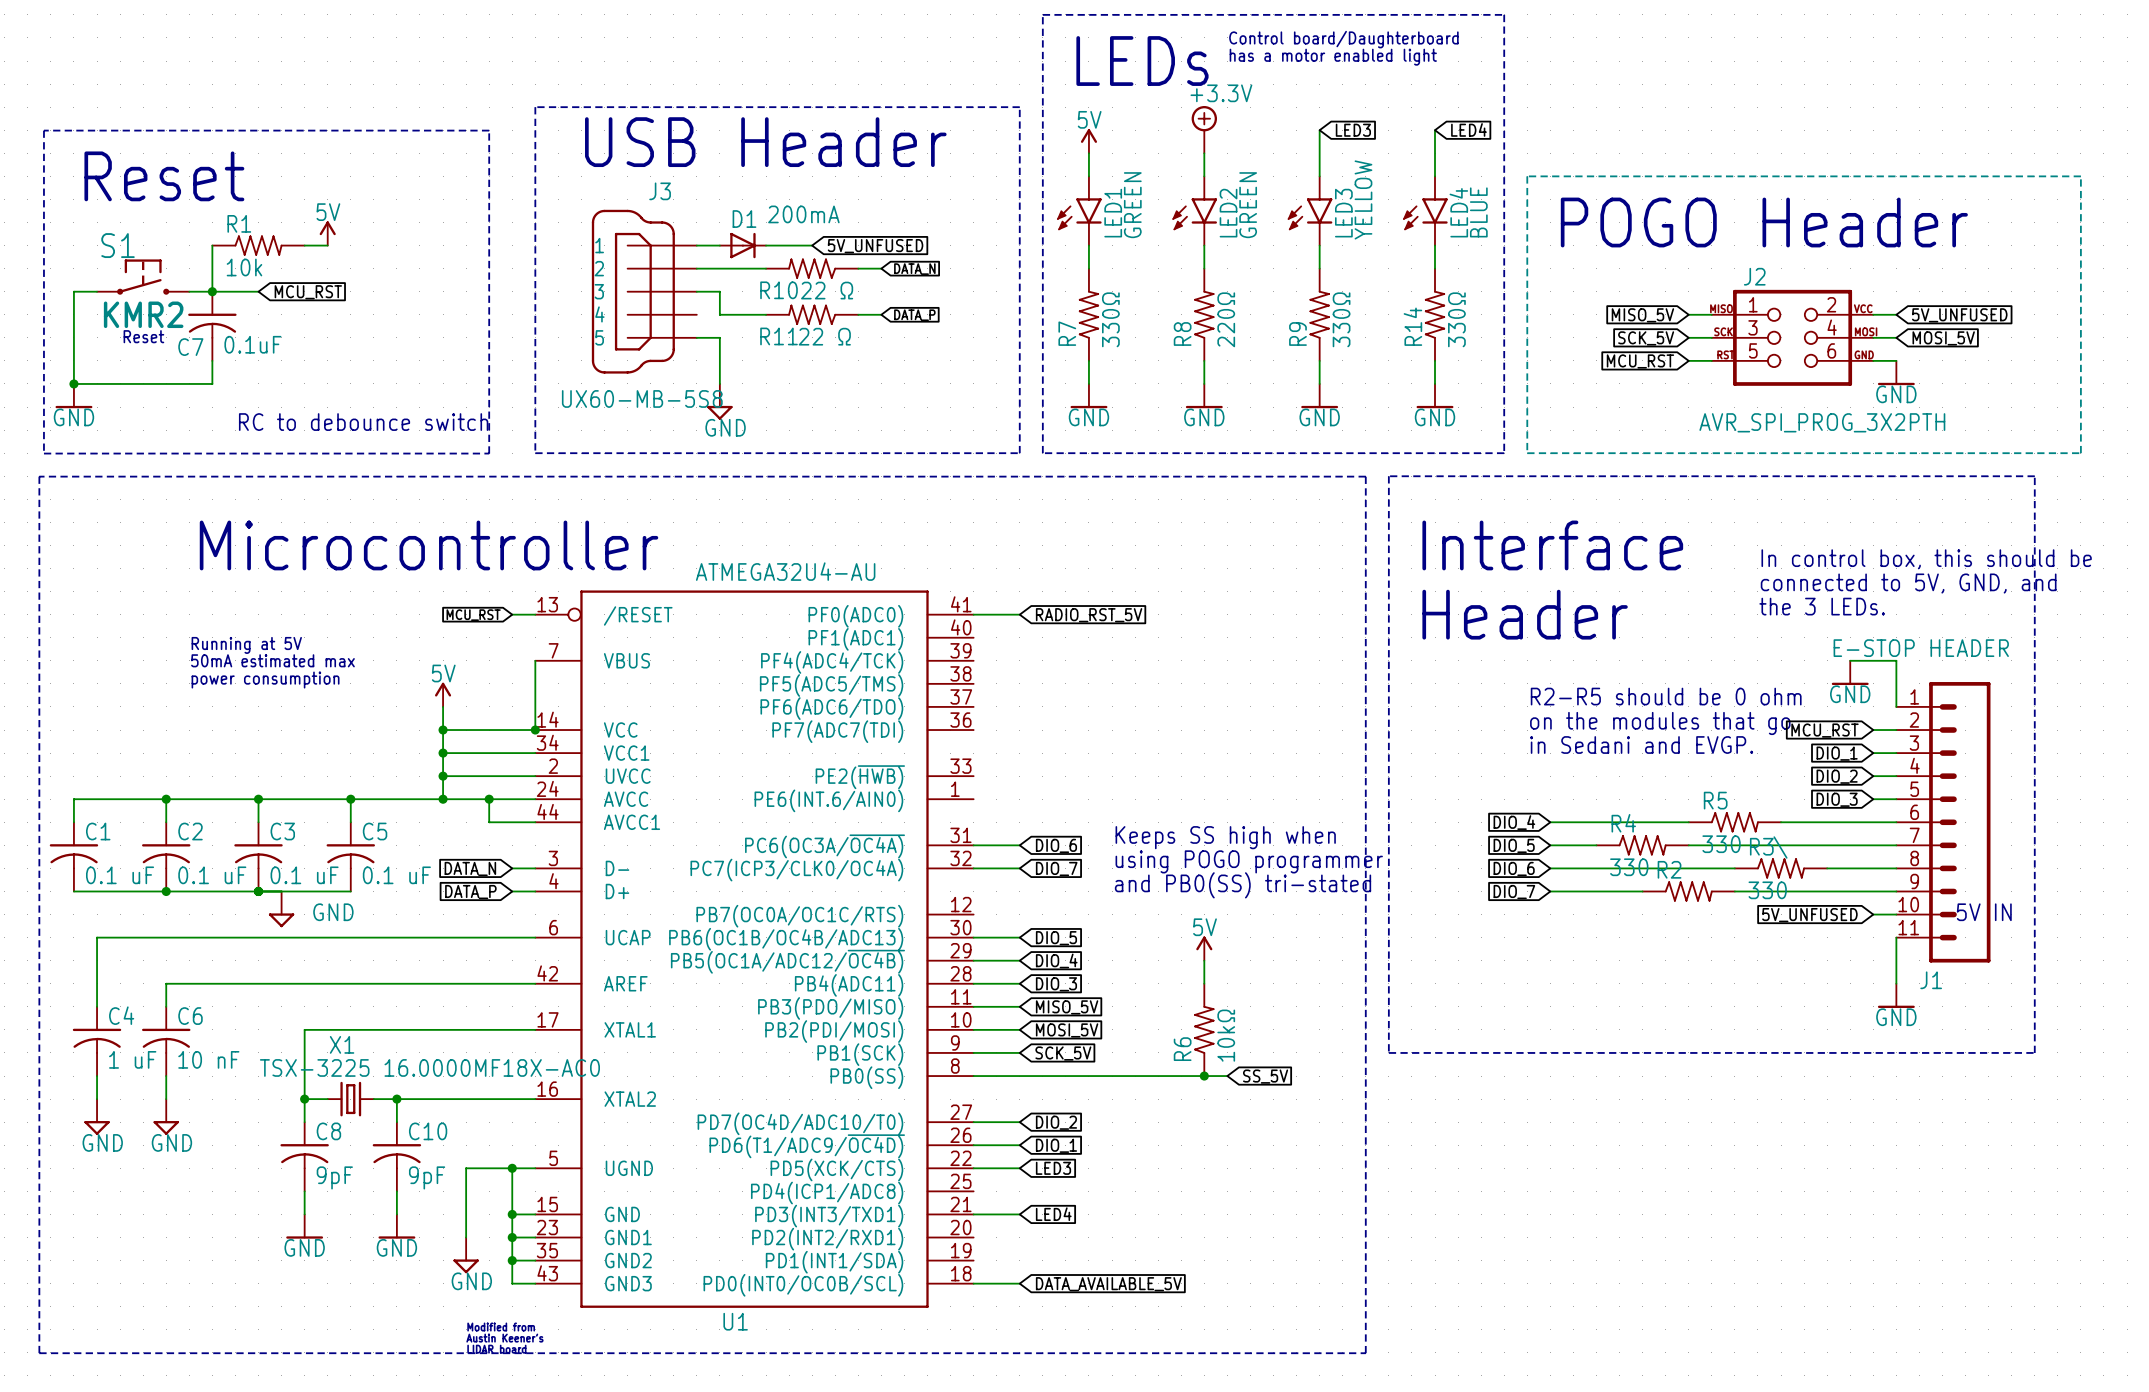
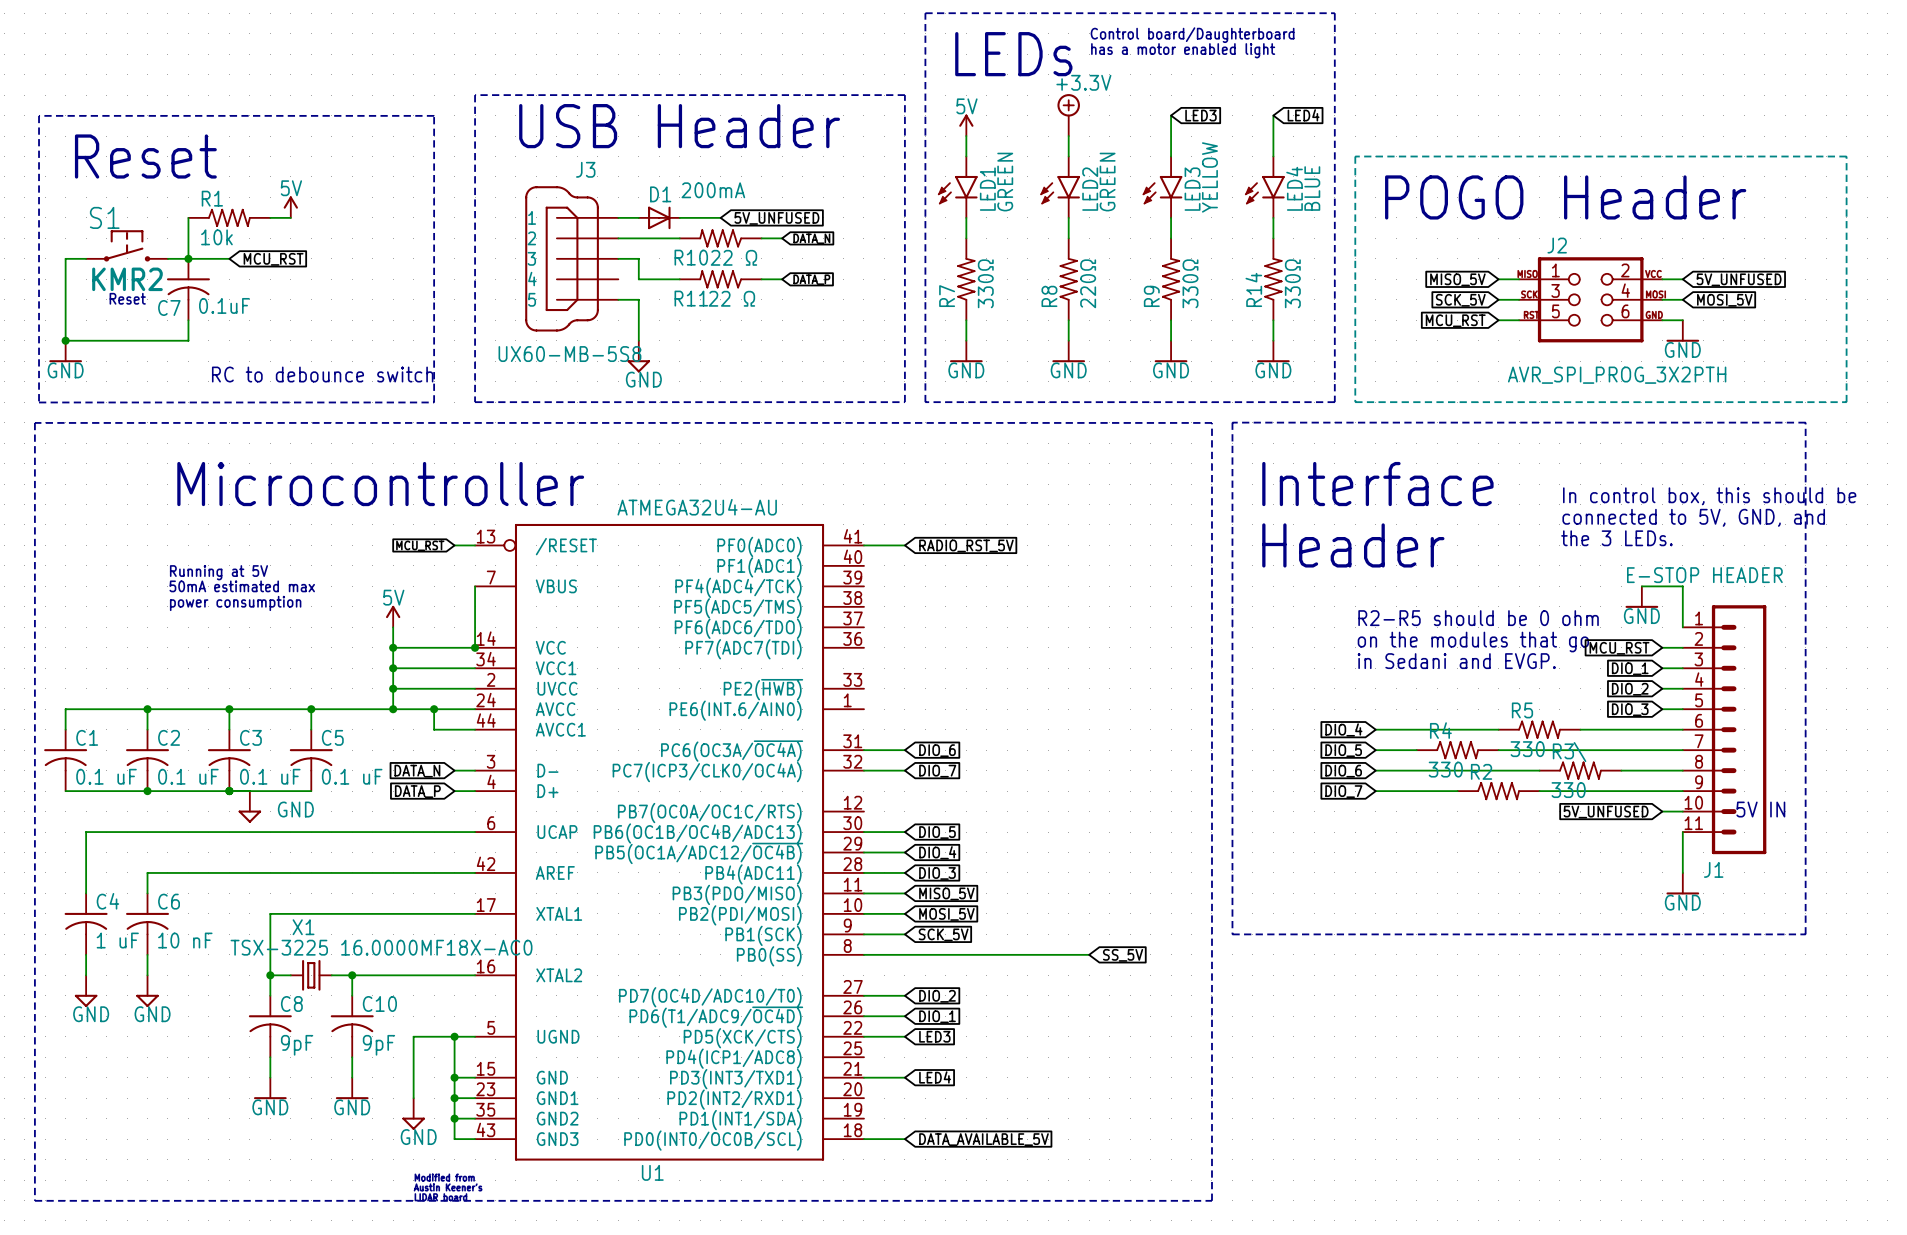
text: Keeps SS high when (1225, 837) -> none
text: using POGO programmer (1249, 861) -> none
text: and PB0(SS) tri-stated (1242, 885) -> none
power symbol: 5V (1204, 948) -> none
wire: (1204, 960) (1204, 983) -> none
R6: 10kΩ (1204, 1029) -> none
junction: (1204, 1076) -> none

